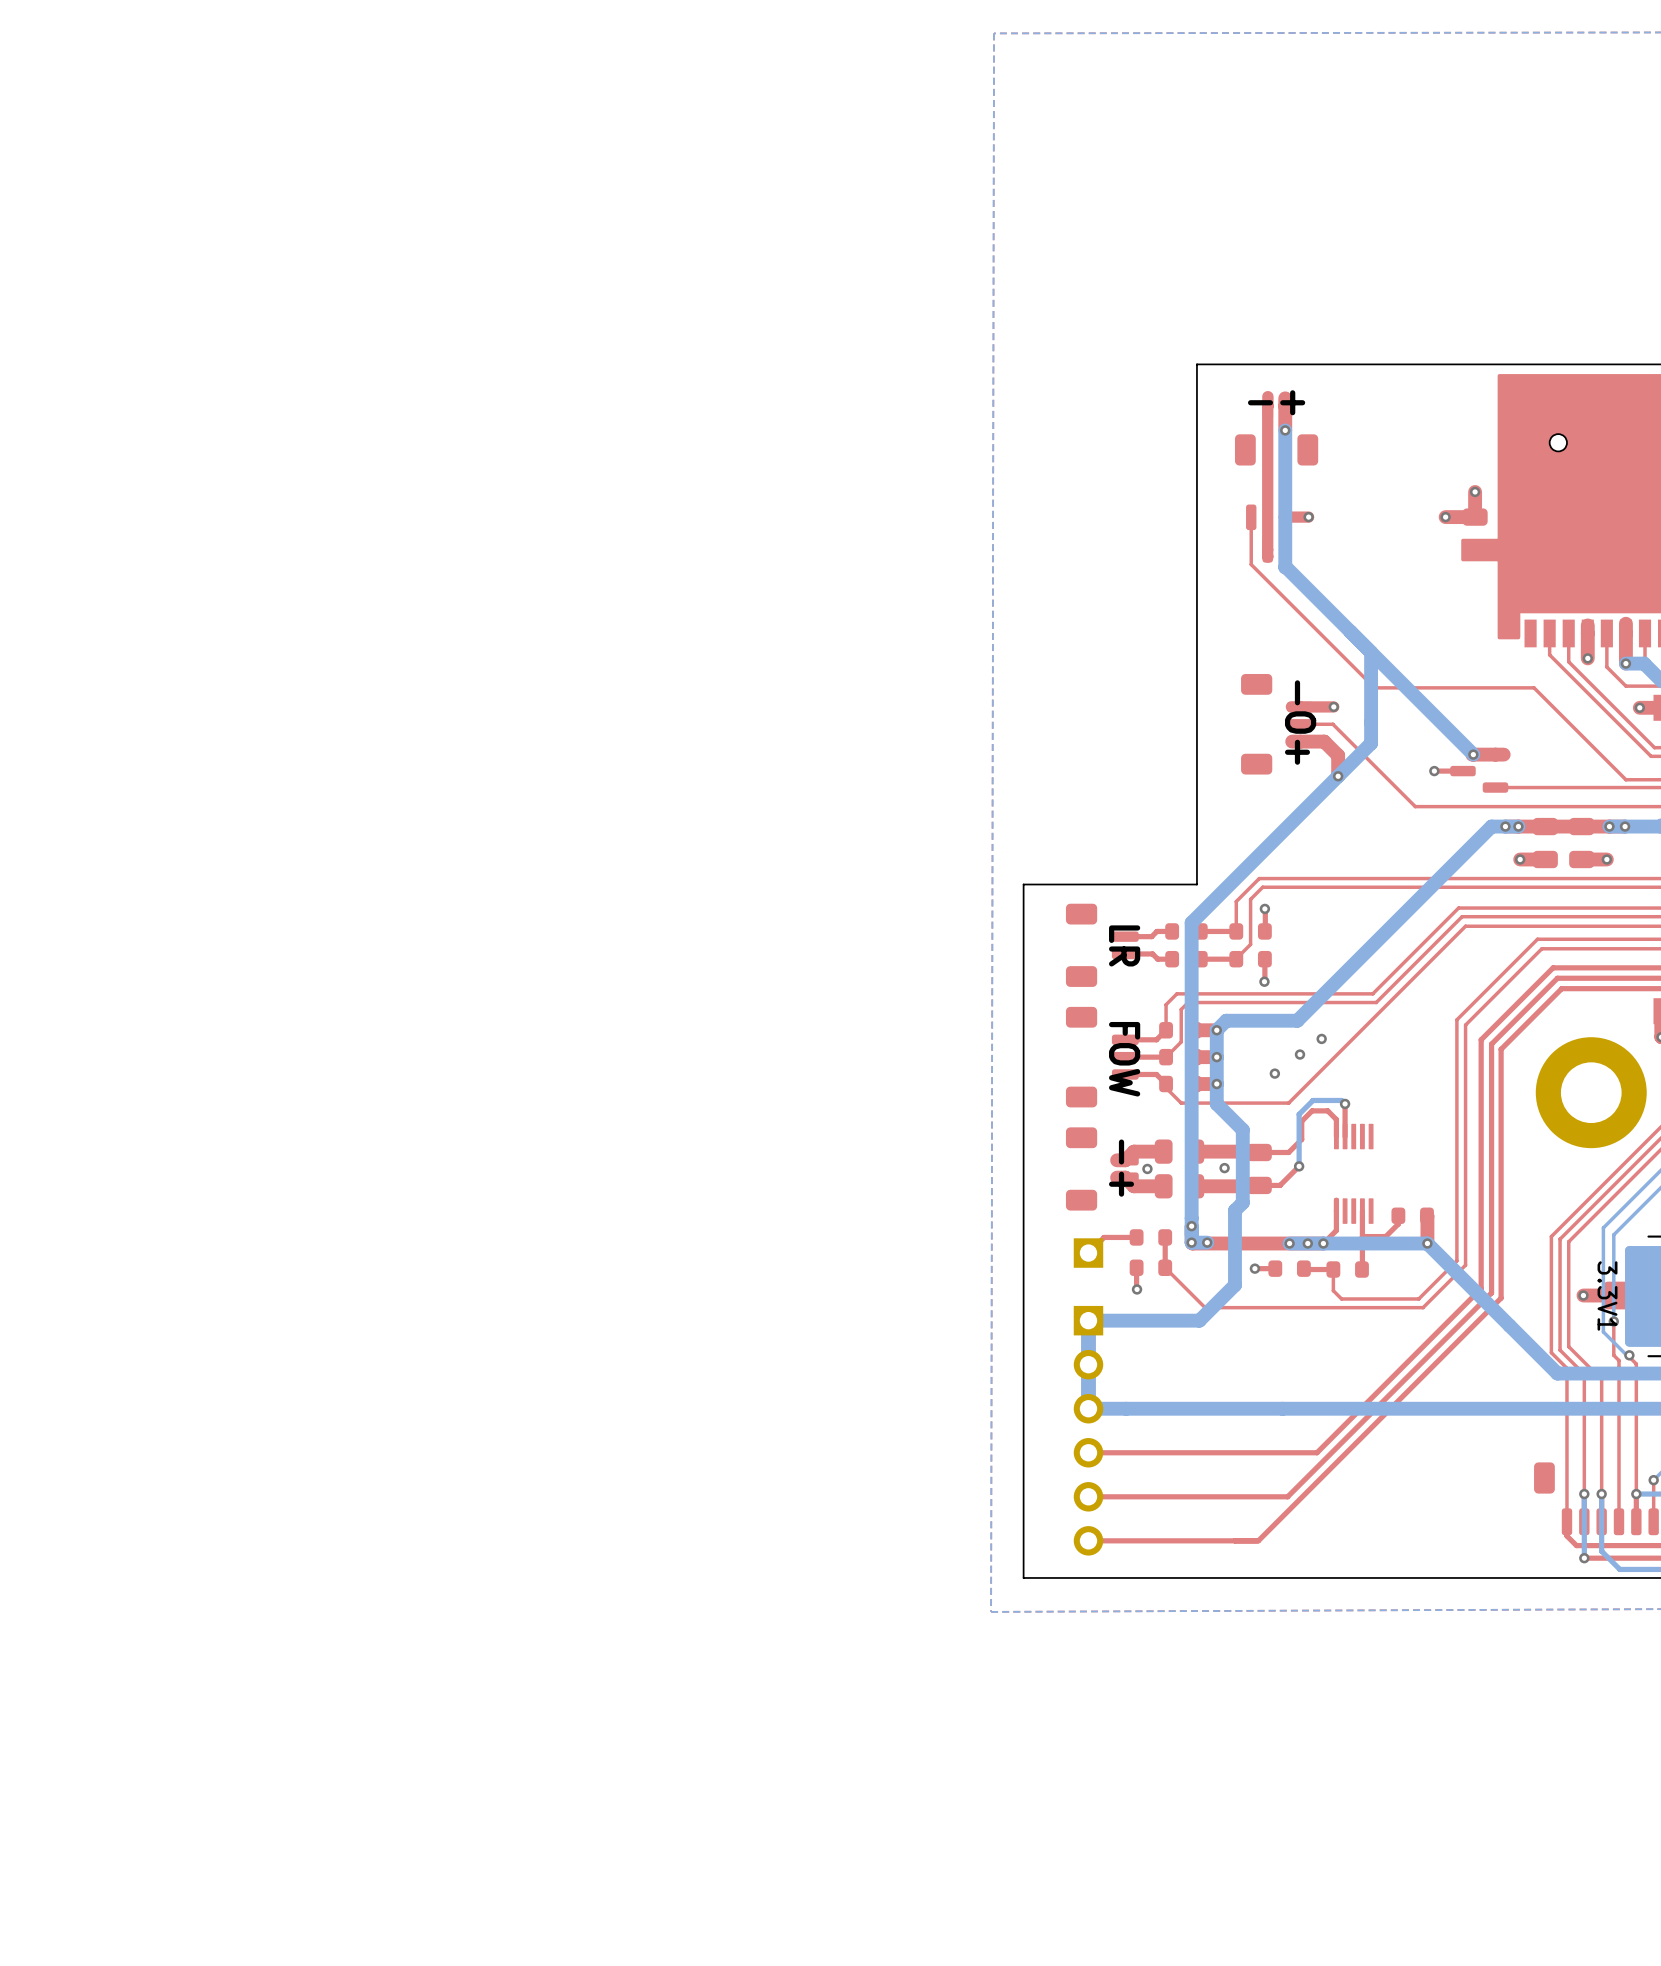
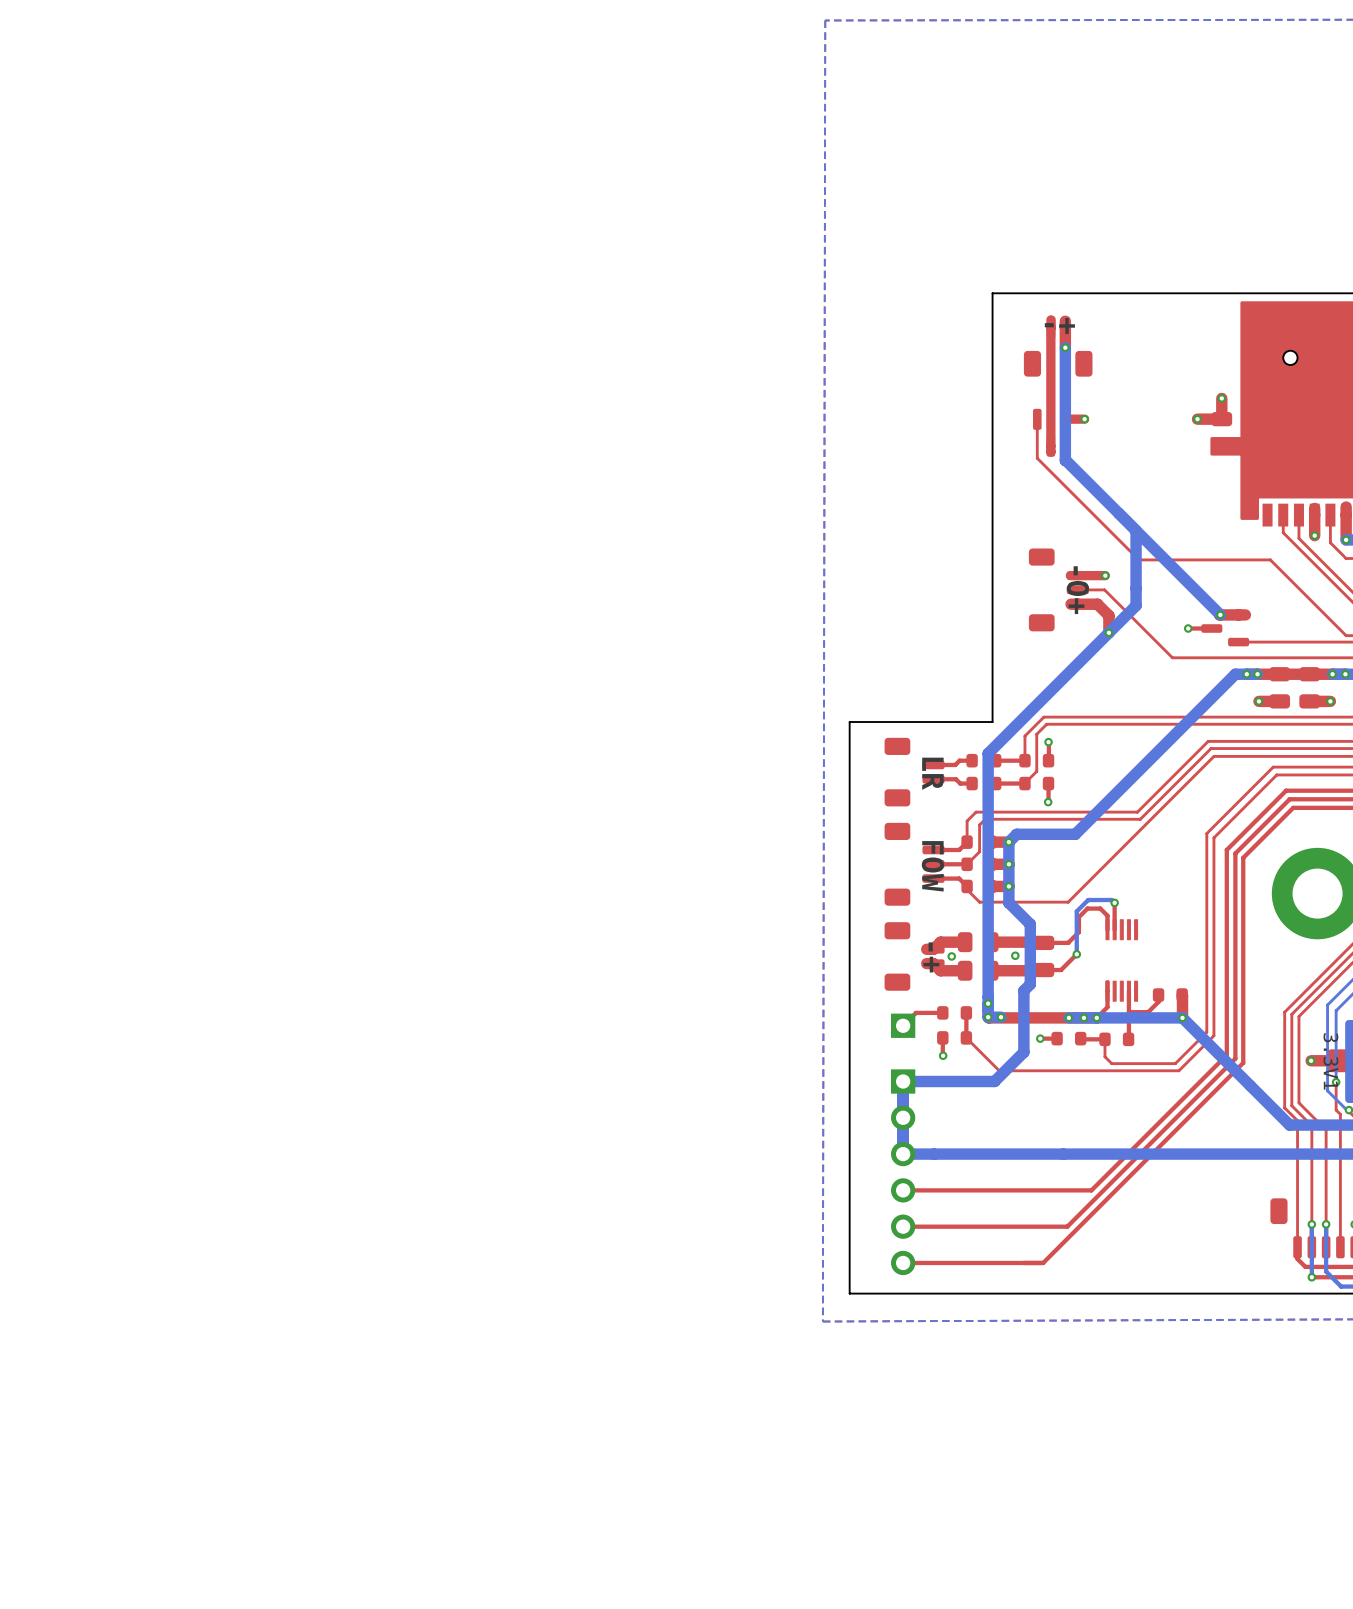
via: (1321, 1038) -> none
via: (1300, 1054) -> none
via: (1274, 1073) -> none

